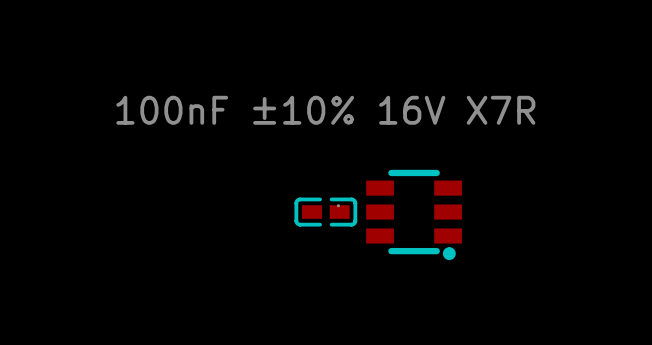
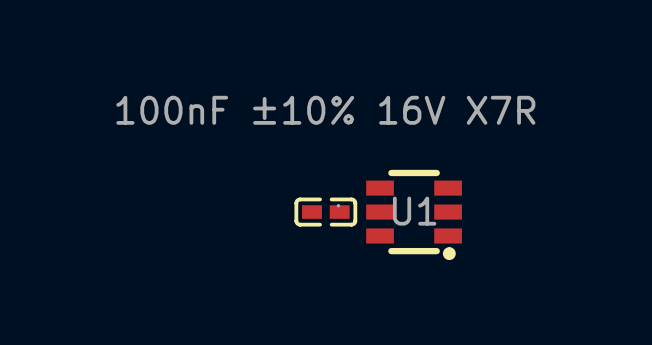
U1 name: none -> U1 (414, 211)

